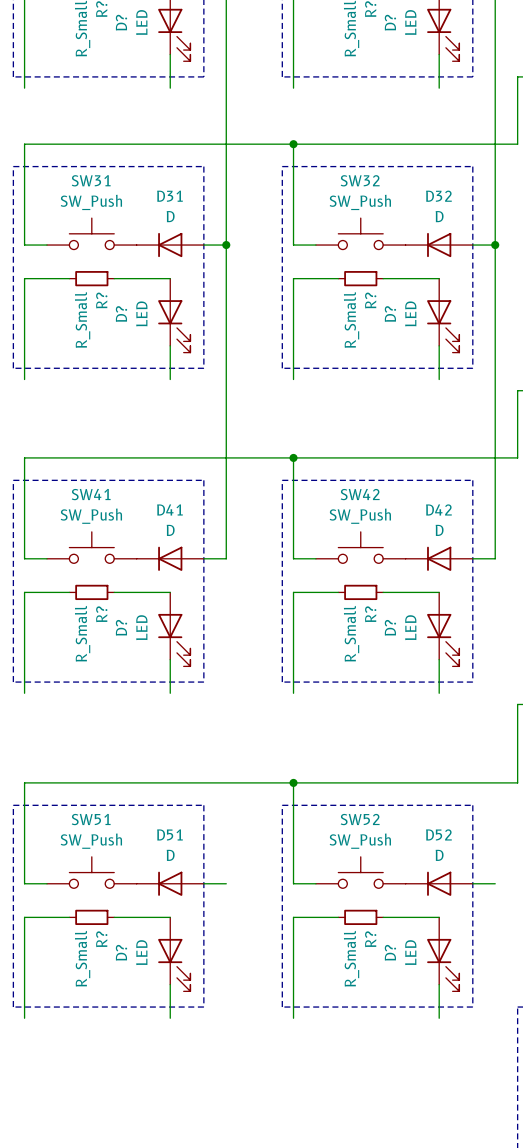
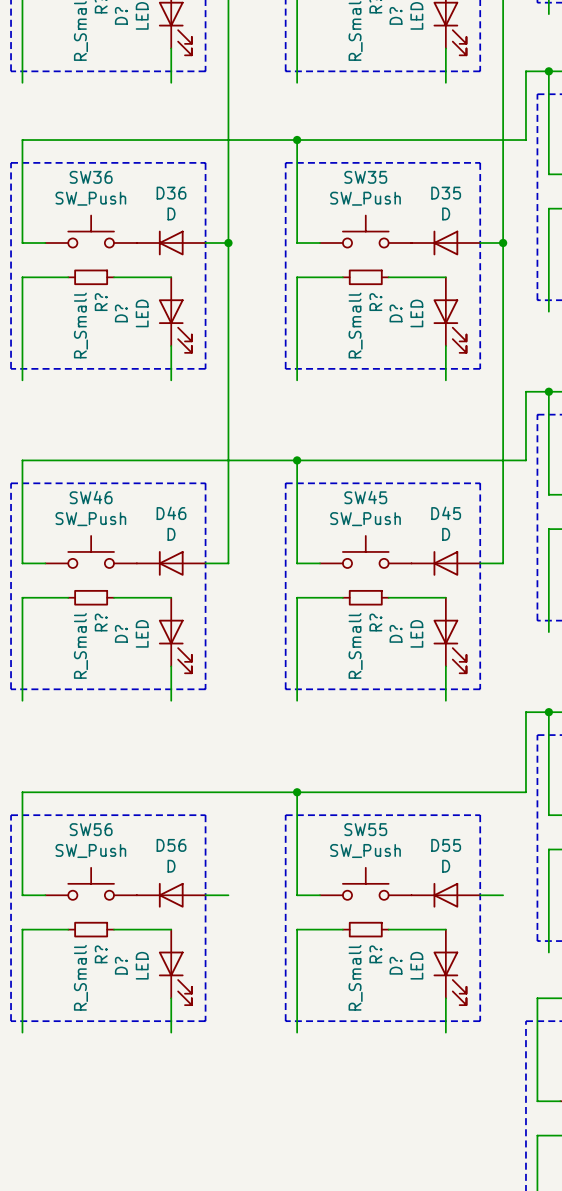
SW31 name: SW31 (91, 180) -> SW36 (91, 177)
SW32 name: SW32 (360, 180) -> SW35 (365, 177)
D31 name: D31 (169, 196) -> D36 (171, 193)
D32 name: D32 (438, 196) -> D35 (446, 193)
SW41 name: SW41 (91, 494) -> SW46 (91, 497)
SW42 name: SW42 (360, 494) -> SW45 (365, 497)
D41 name: D41 (169, 509) -> D46 (171, 513)
D42 name: D42 (438, 509) -> D45 (446, 513)
SW51 name: SW51 (91, 819) -> SW56 (91, 829)
SW52 name: SW52 (360, 819) -> SW55 (365, 829)
D51 name: D51 (169, 834) -> D56 (171, 845)
D52 name: D52 (438, 834) -> D55 (446, 845)

